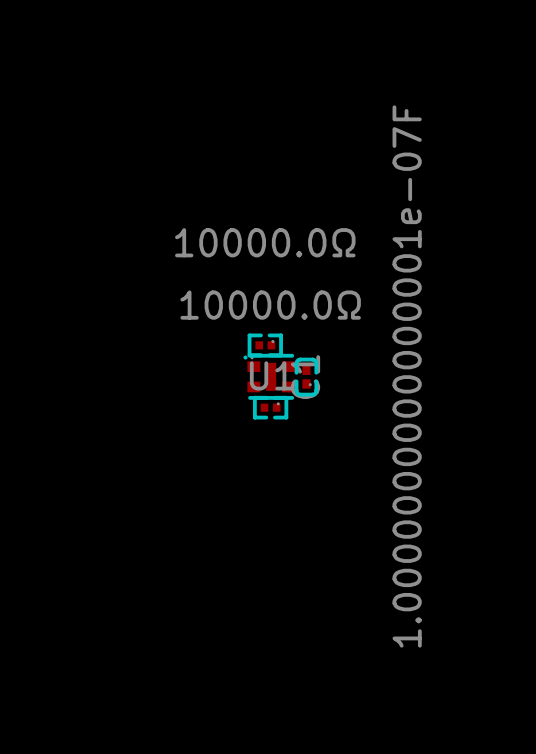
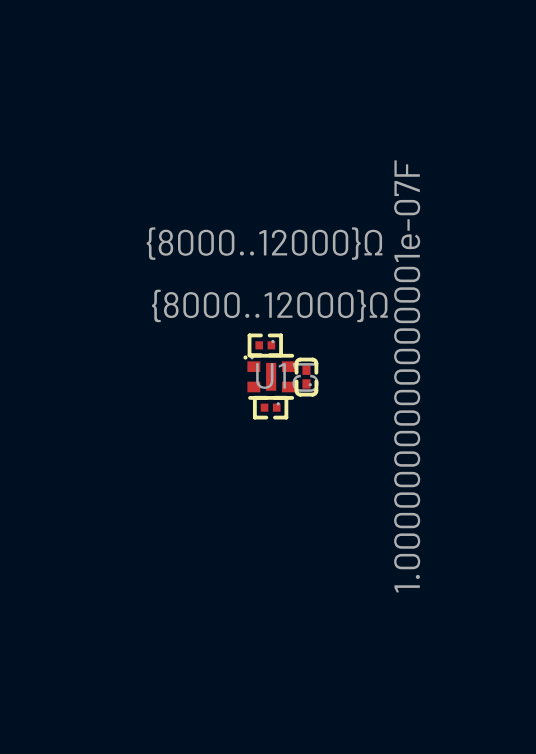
part value: 10000.0Ω (265, 242) -> {8000..12000}Ω (264, 243)
part value: 10000.0Ω (270, 305) -> {8000..12000}Ω (269, 305)

